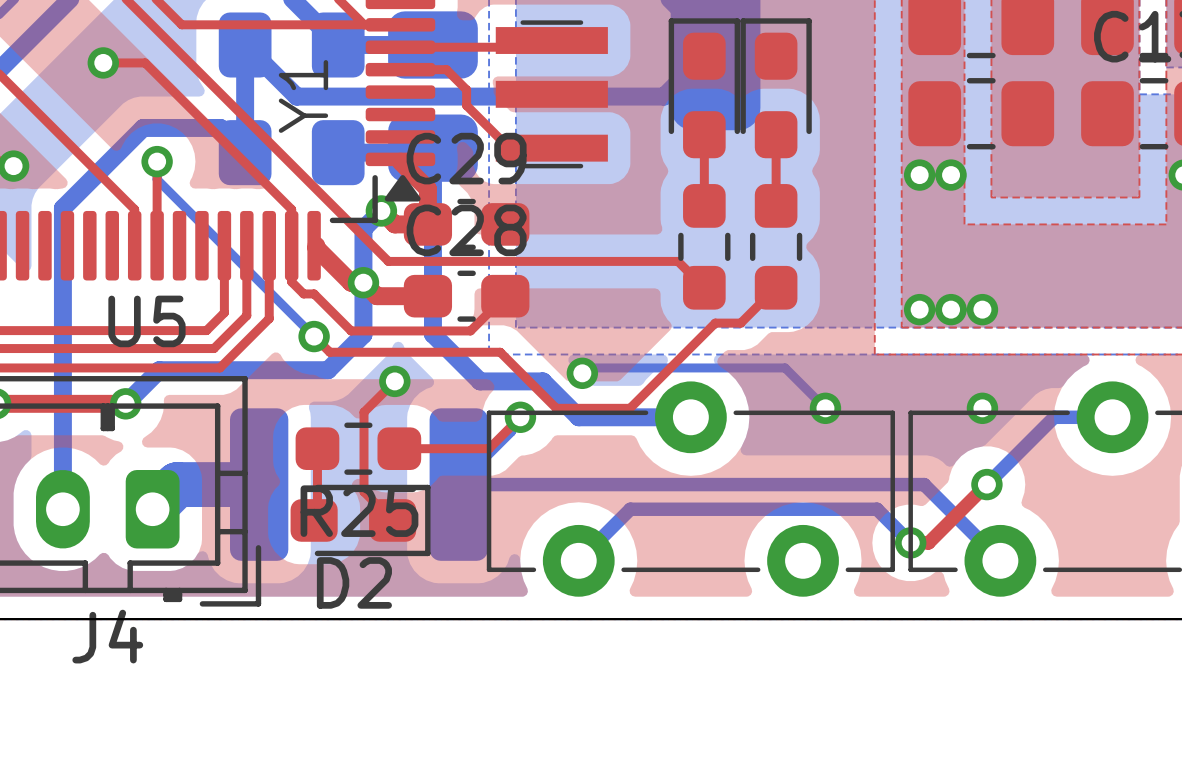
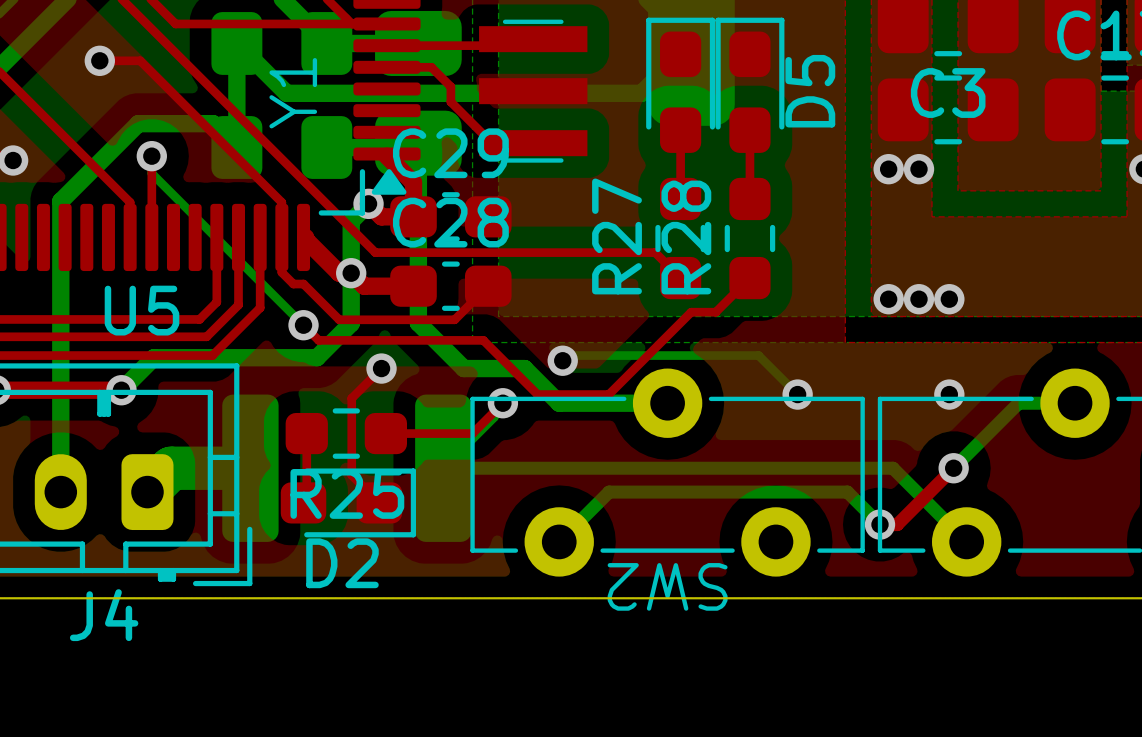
D5 name: none -> D5 (810, 91)
C3 name: none -> C3 (948, 93)
R27 name: none -> R27 (617, 236)
R28 name: none -> R28 (686, 237)
SW2 name: none -> SW2 (667, 586)

